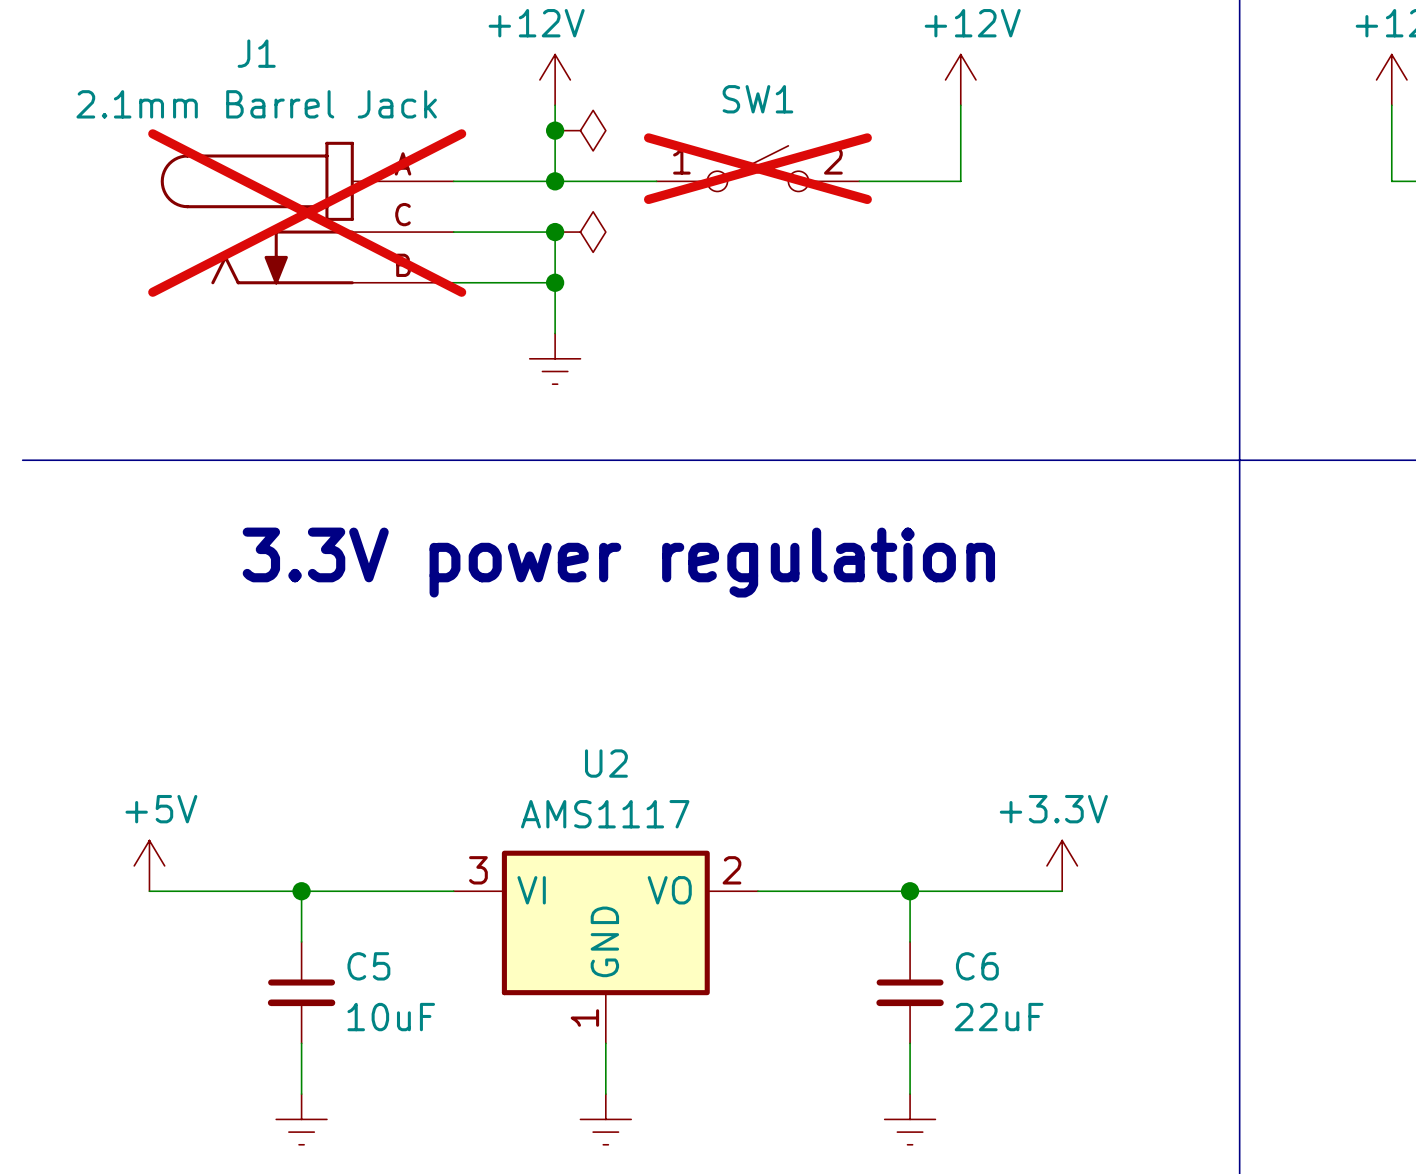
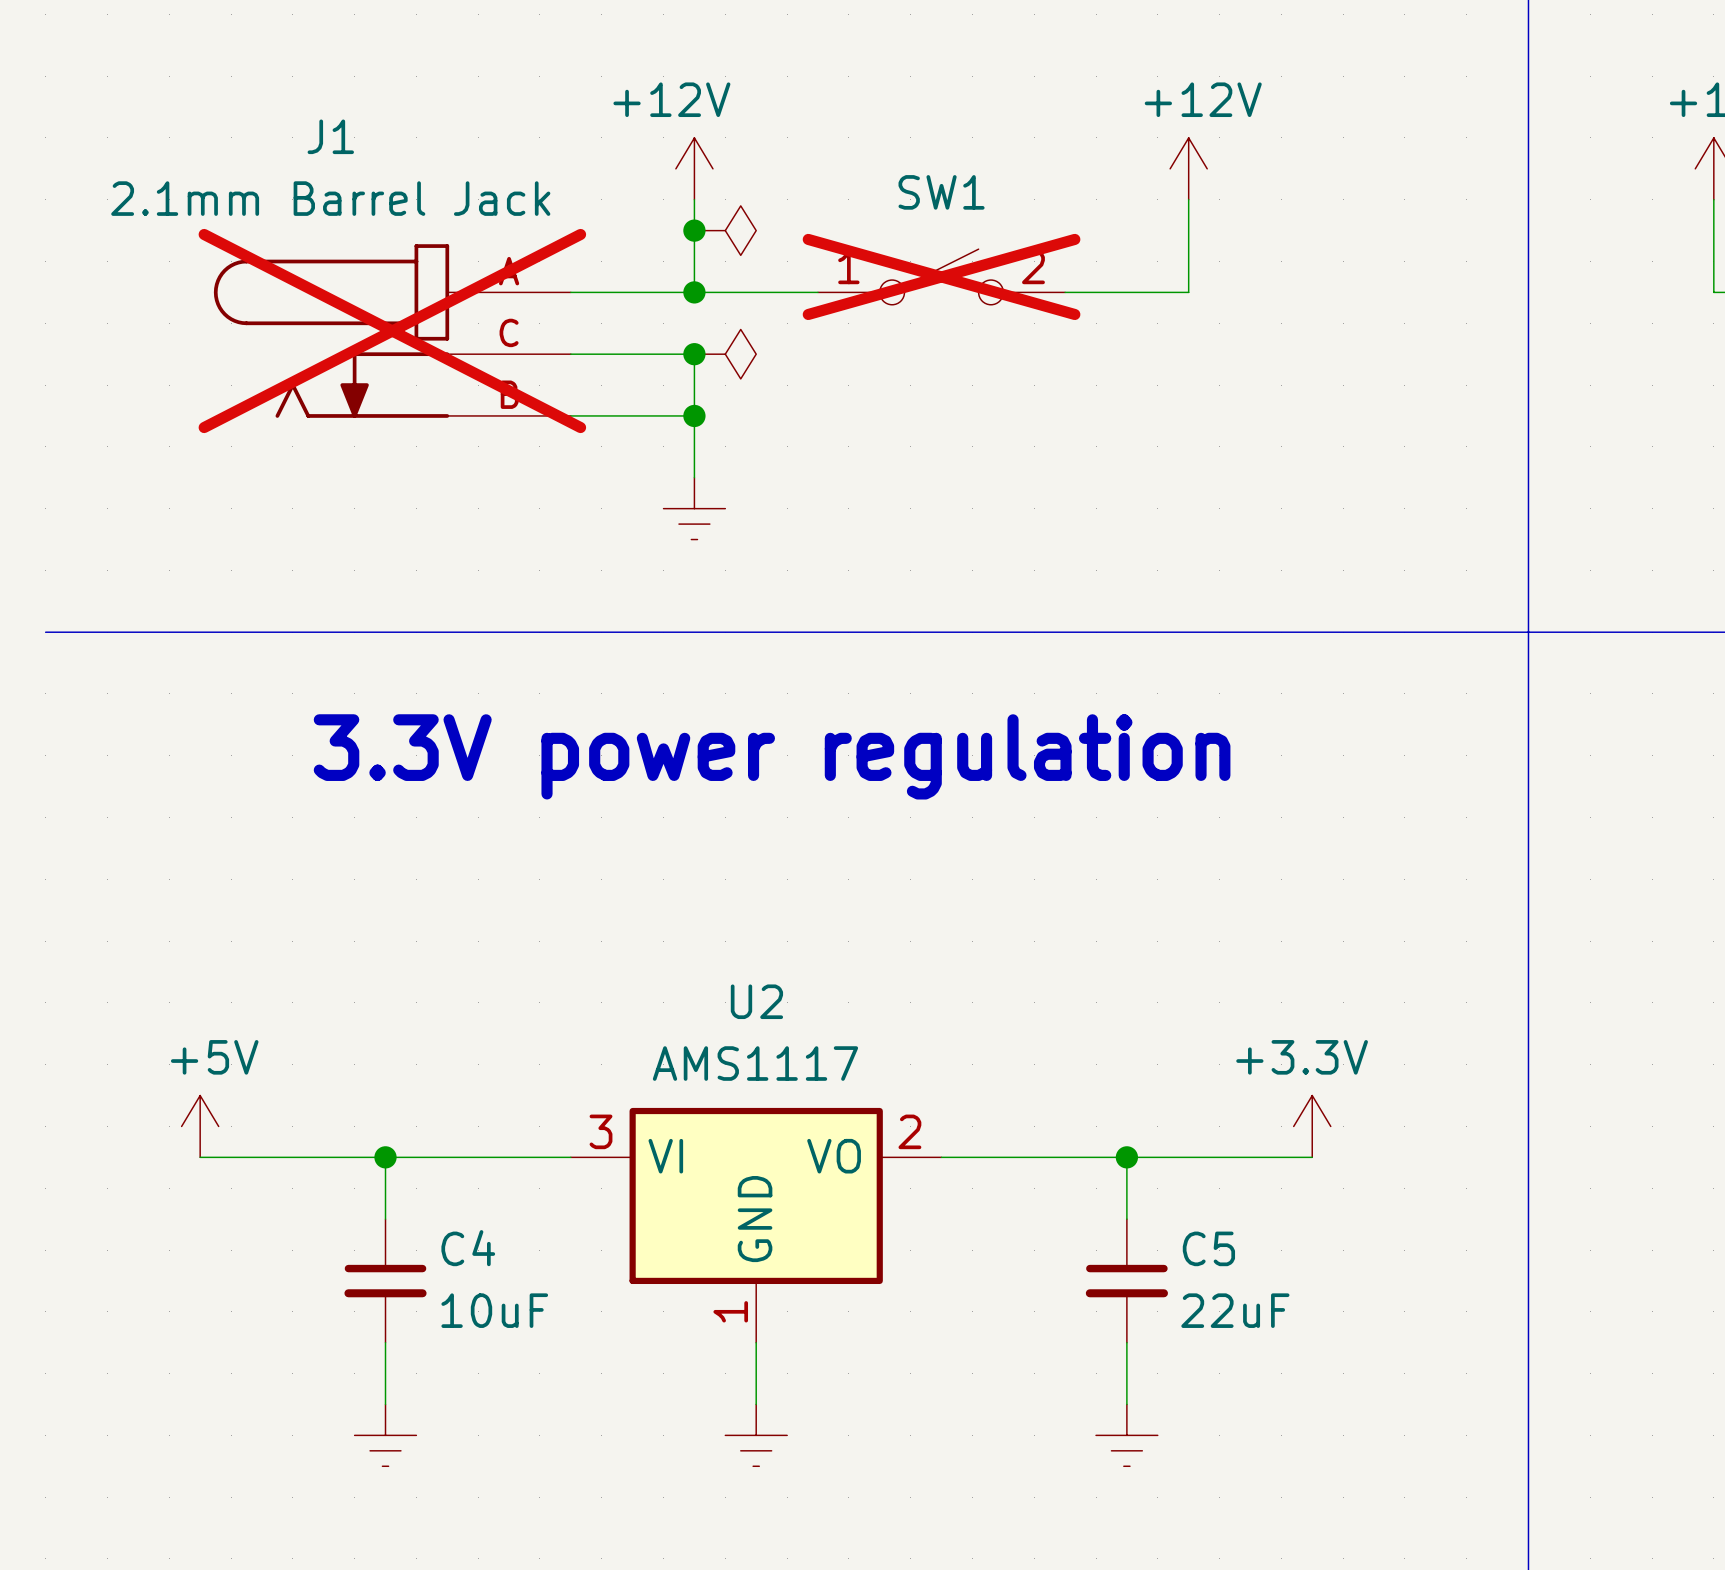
C5 name: C5 (368, 966) -> C4 (468, 1248)
C6 name: C6 (977, 966) -> C5 (1208, 1248)

